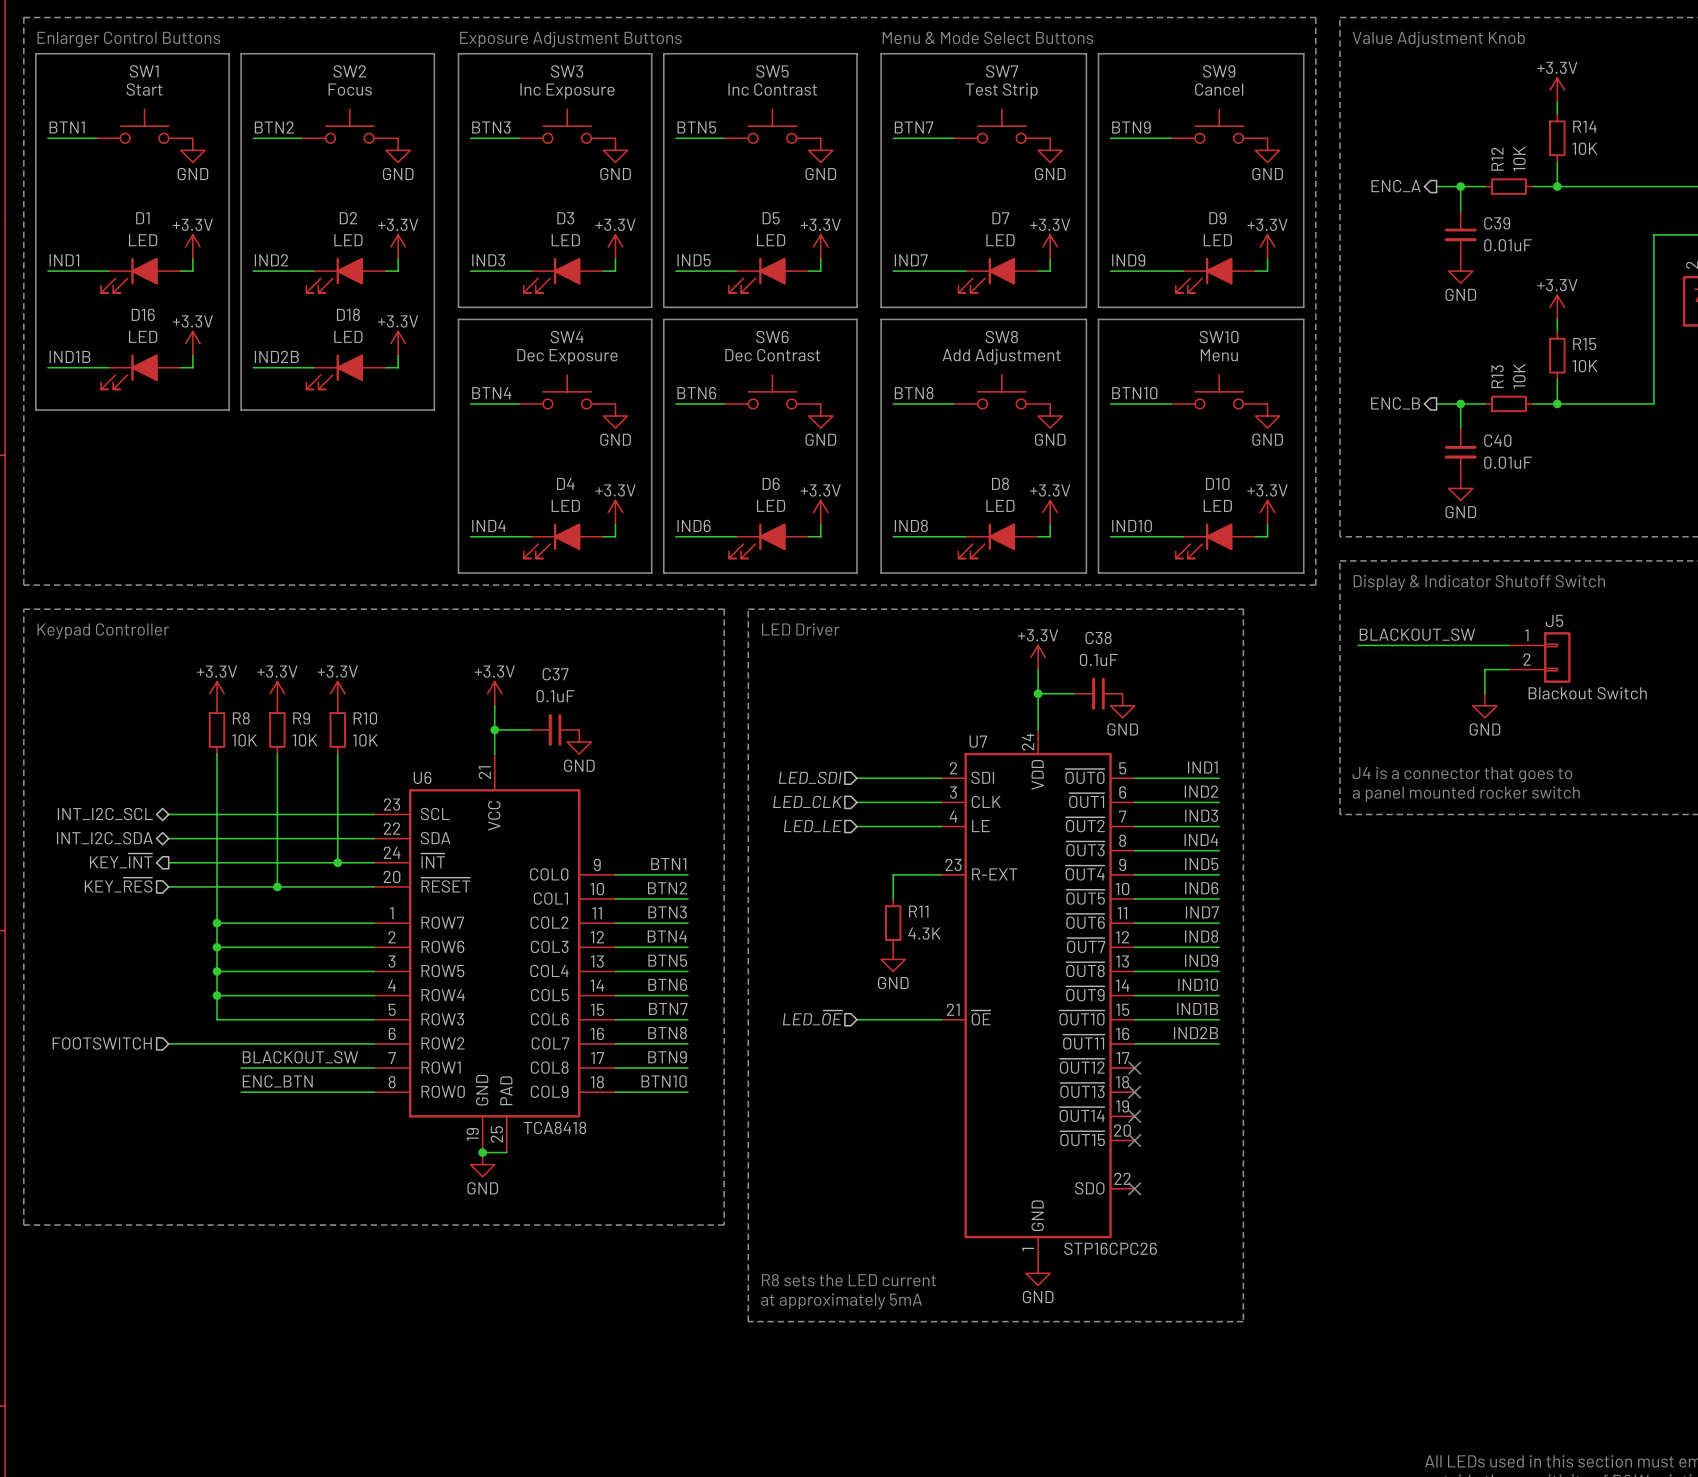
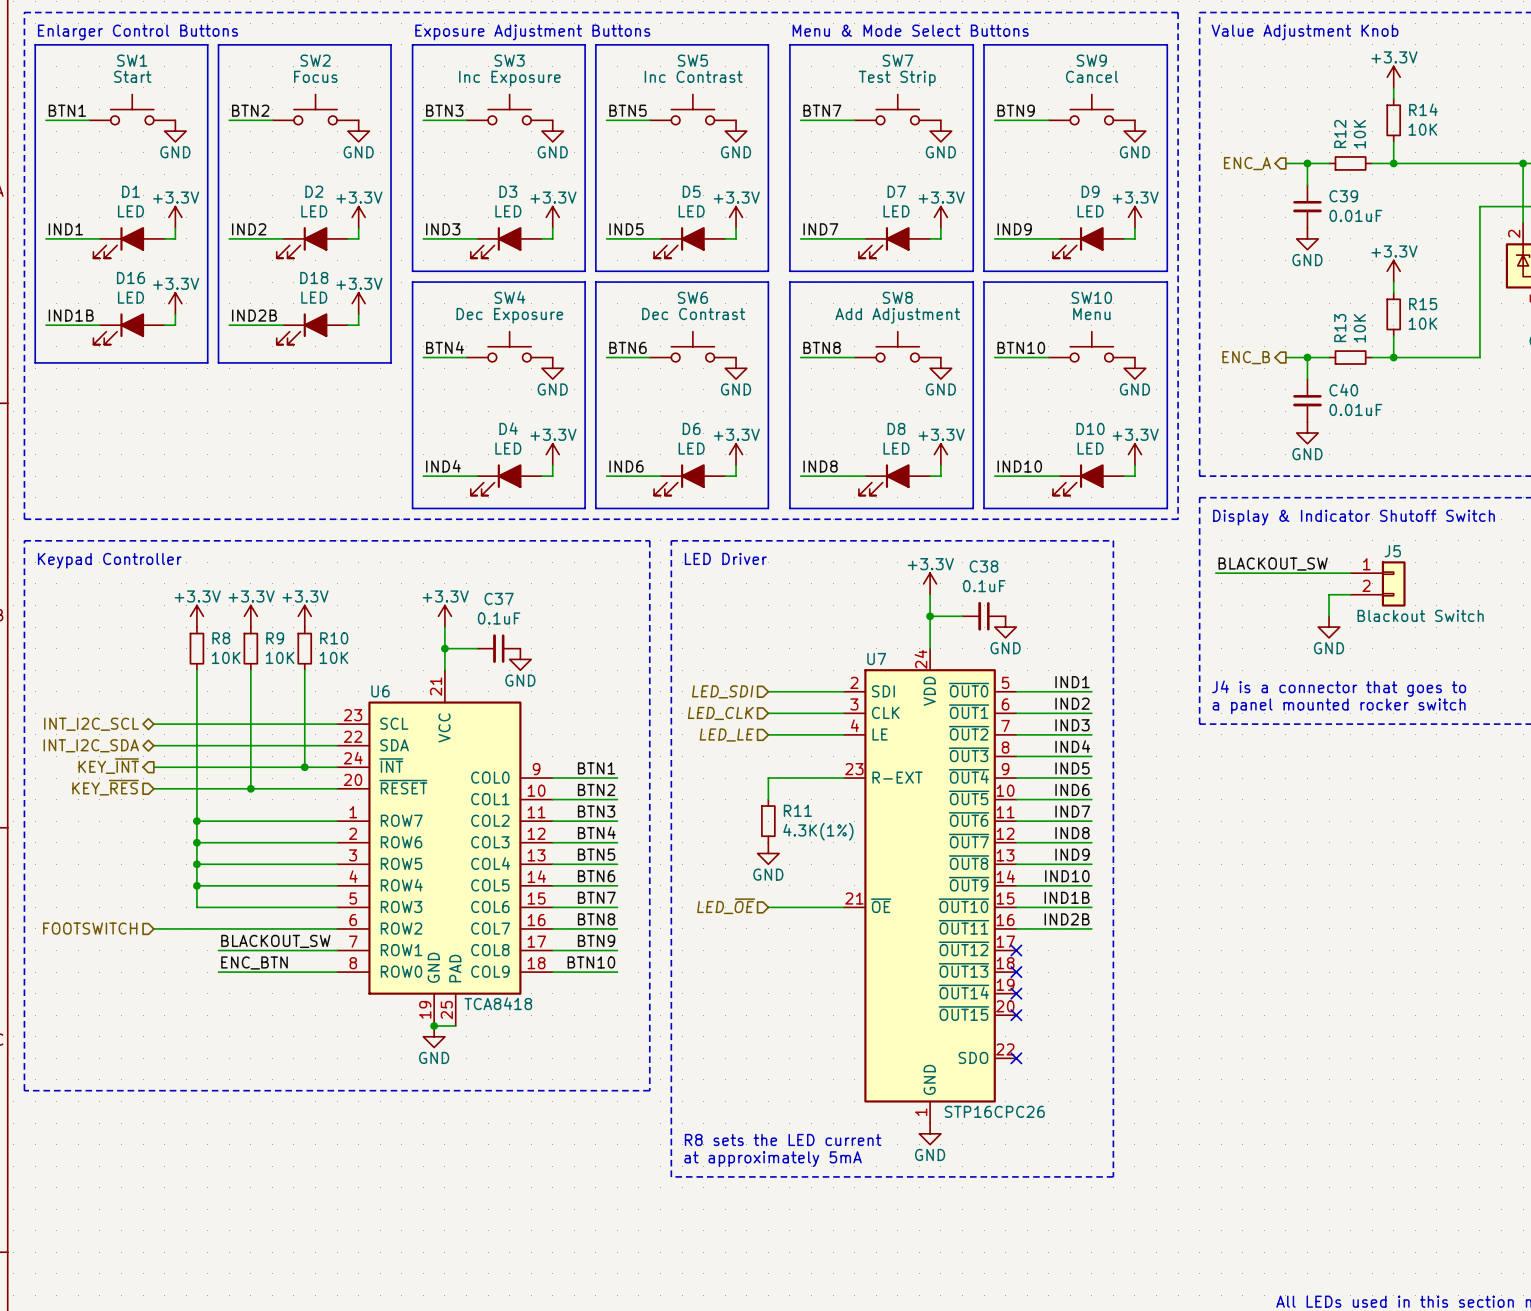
wire: (893, 874) (893, 899) -> (800, 778) (768, 778) (768, 799)
R11 position: (893, 923) -> (768, 821)
R11 value: 4.3K (924, 933) -> 4.3K(1%) (818, 831)
power symbol position: GND (893, 959) -> GND (768, 853)

